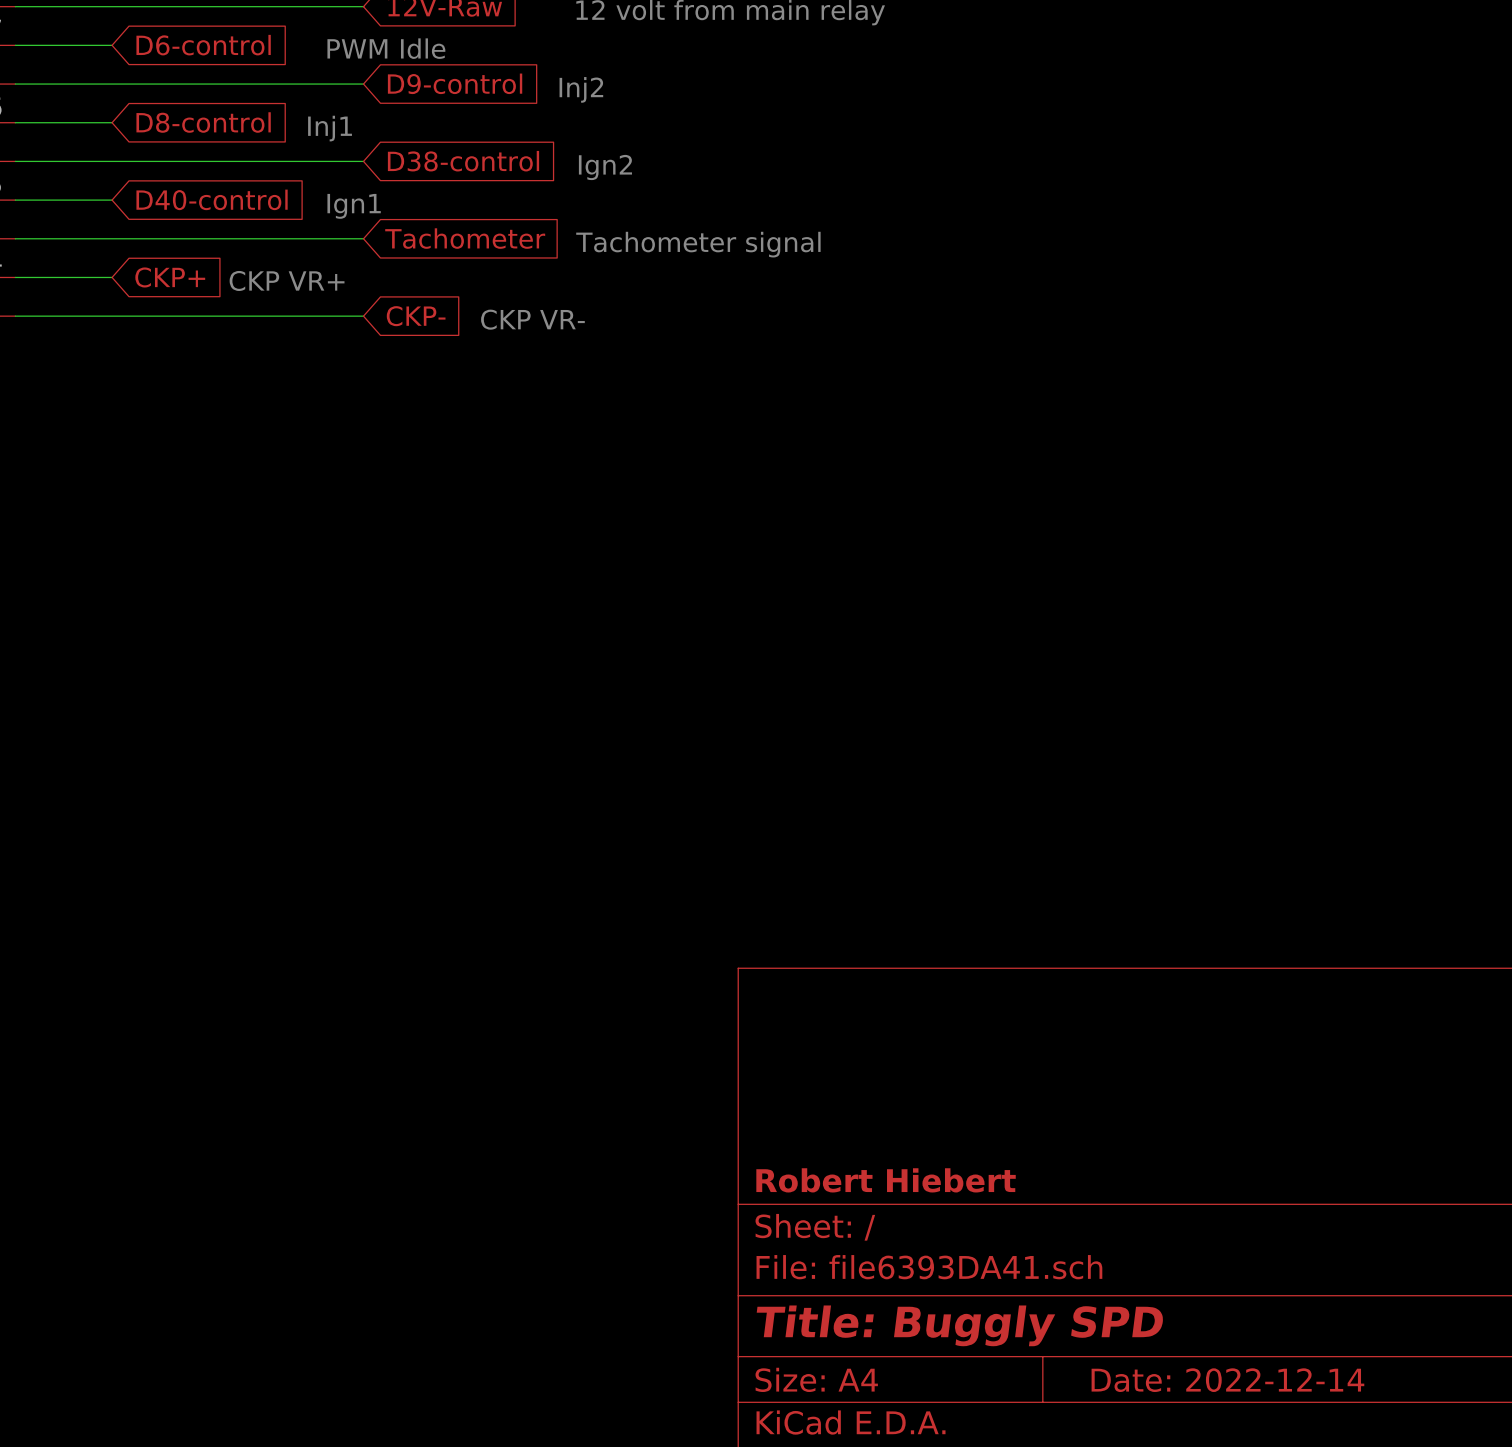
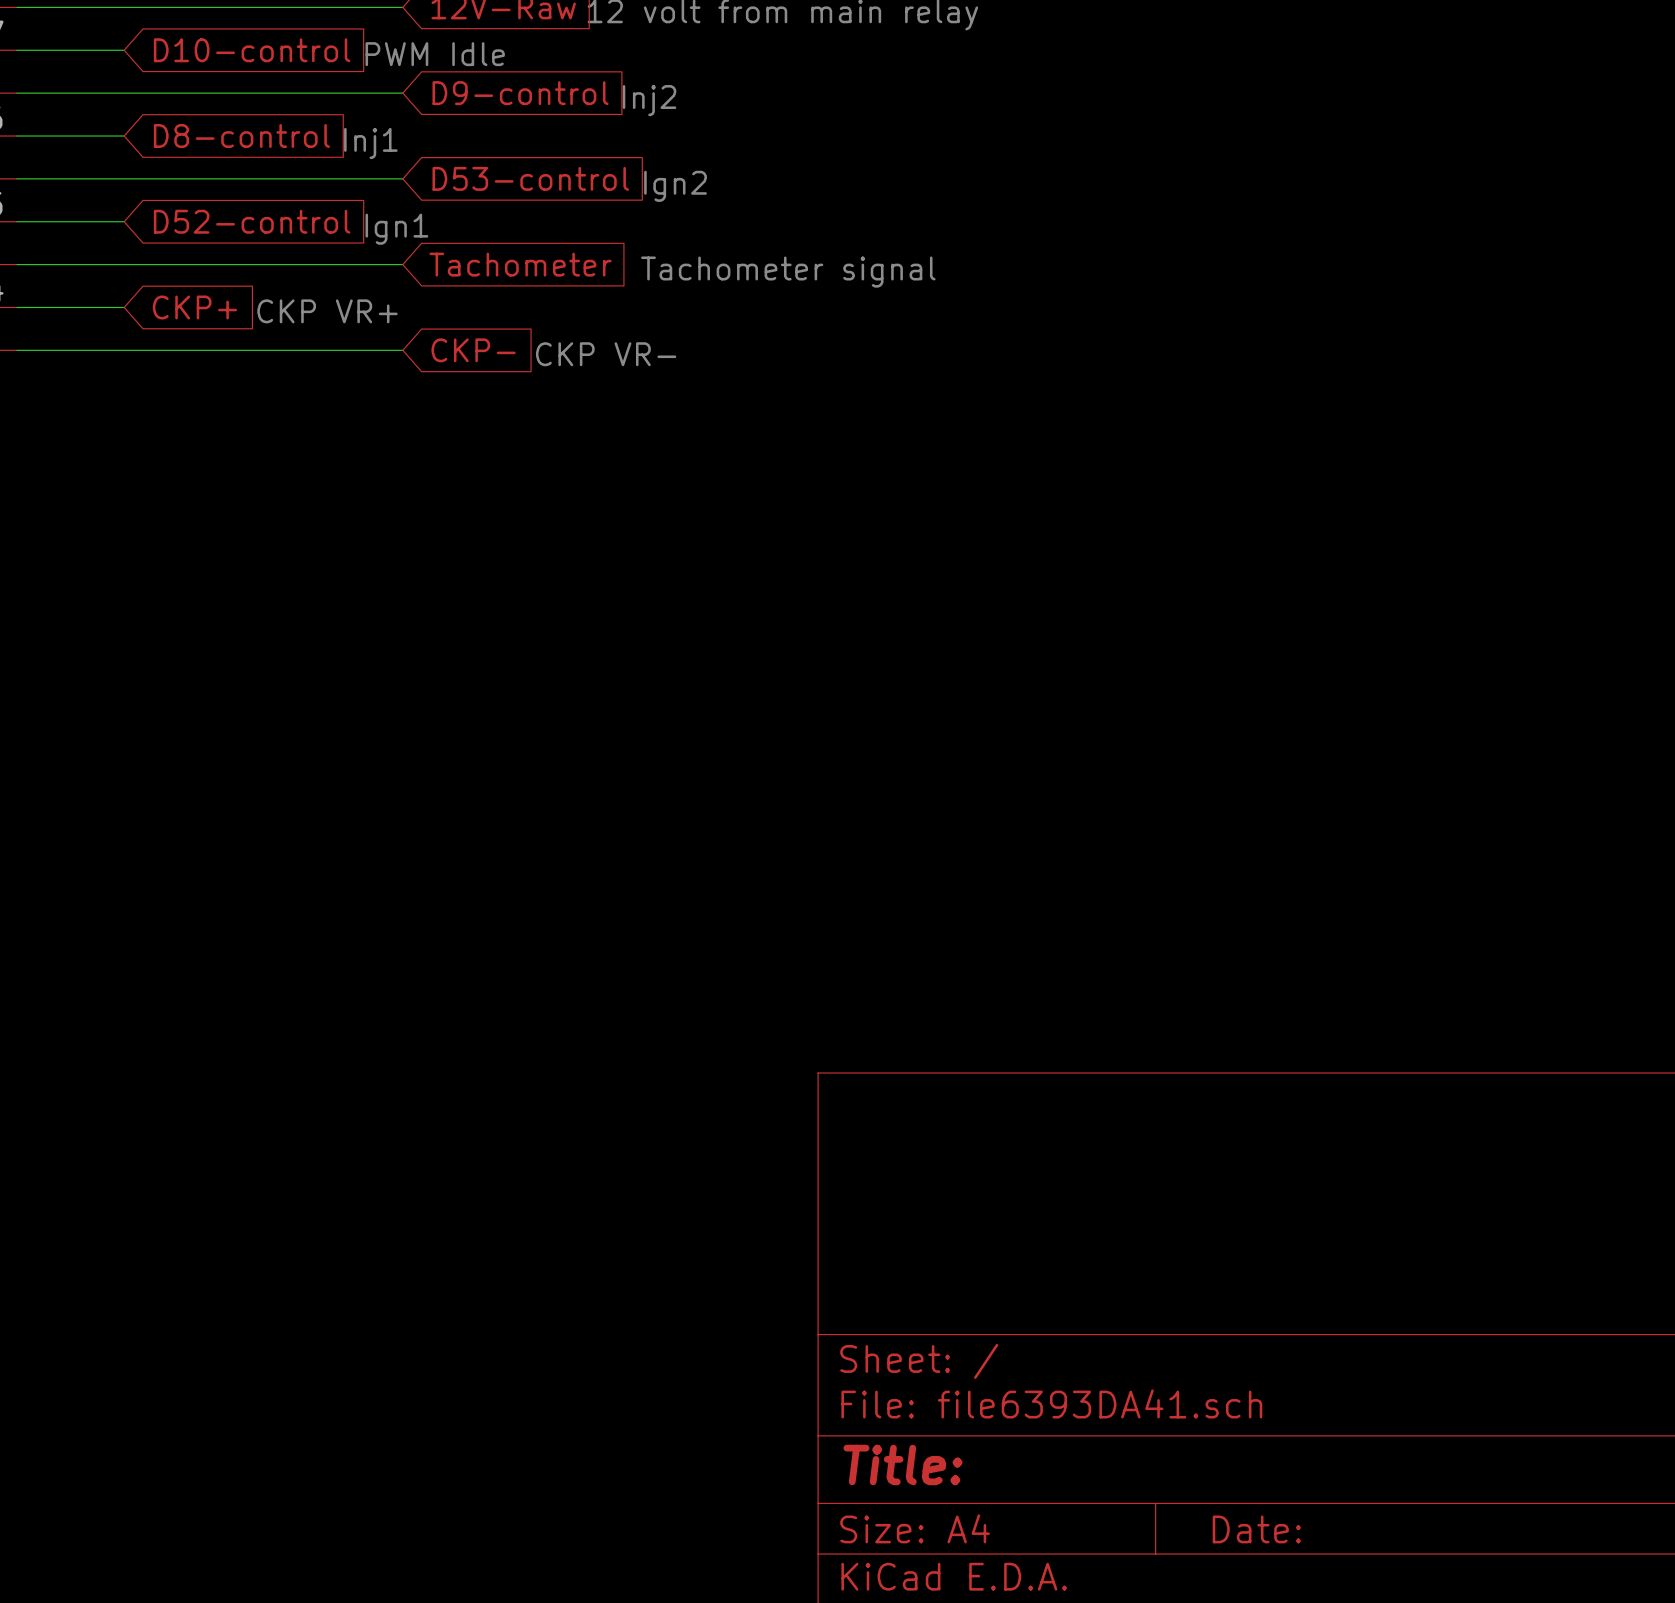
global label: D6-control (203, 45) -> D10-control (252, 50)
global label: D38-control (463, 161) -> D53-control (530, 178)
global label: D40-control (212, 199) -> D52-control (252, 221)
title block: Robert Hiebert (886, 1180) -> none
title block: Title: Buggly SPD (959, 1325) -> Title: (902, 1464)
title block: Date: 2022-12-14 (1227, 1380) -> Date: (1256, 1529)

